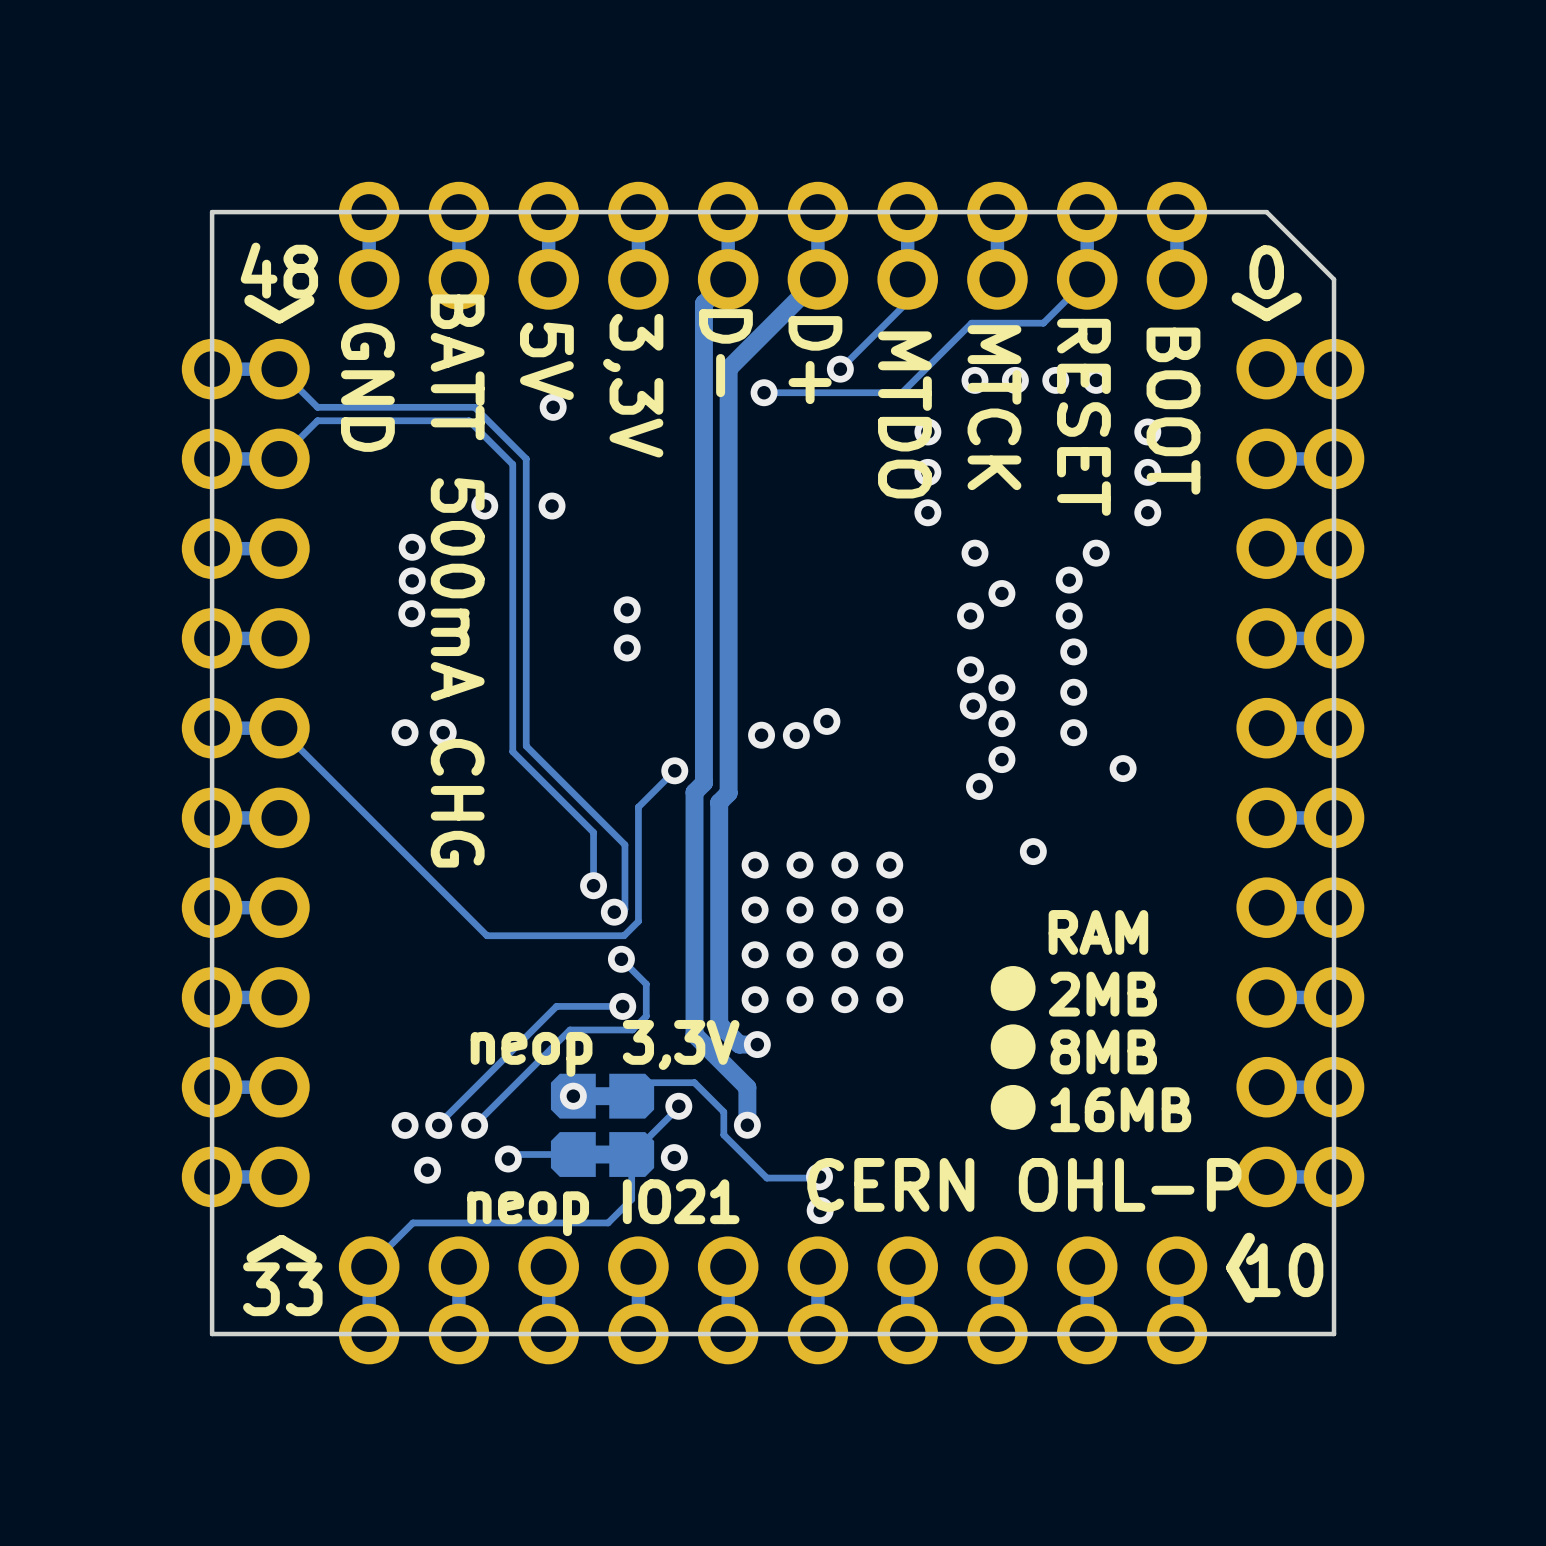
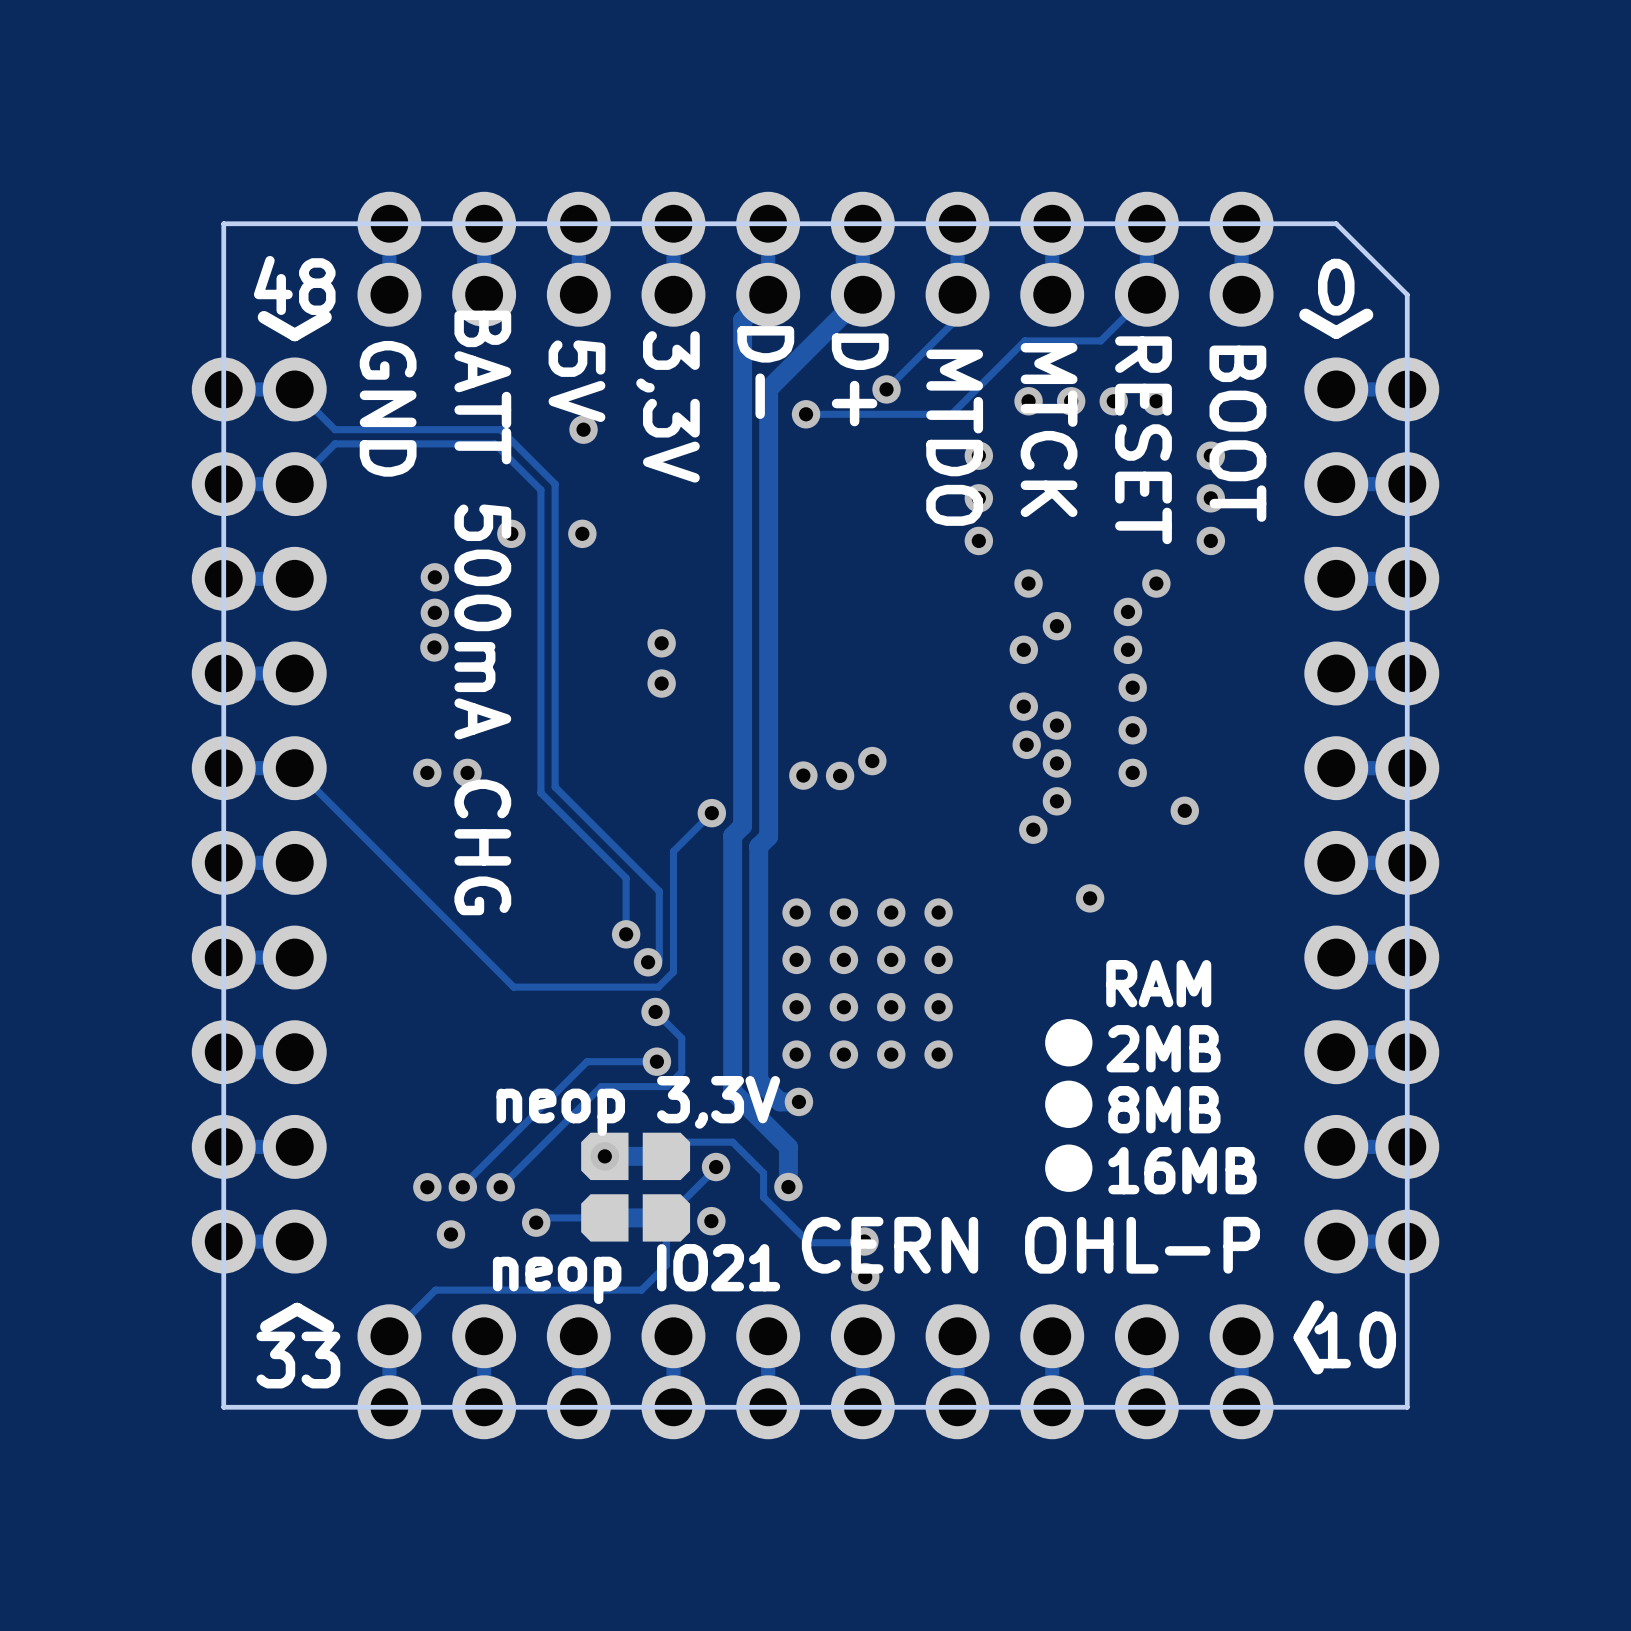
text position: CERN OHL-P (1024, 1184) -> CERN OHL-P (1030, 1245)

